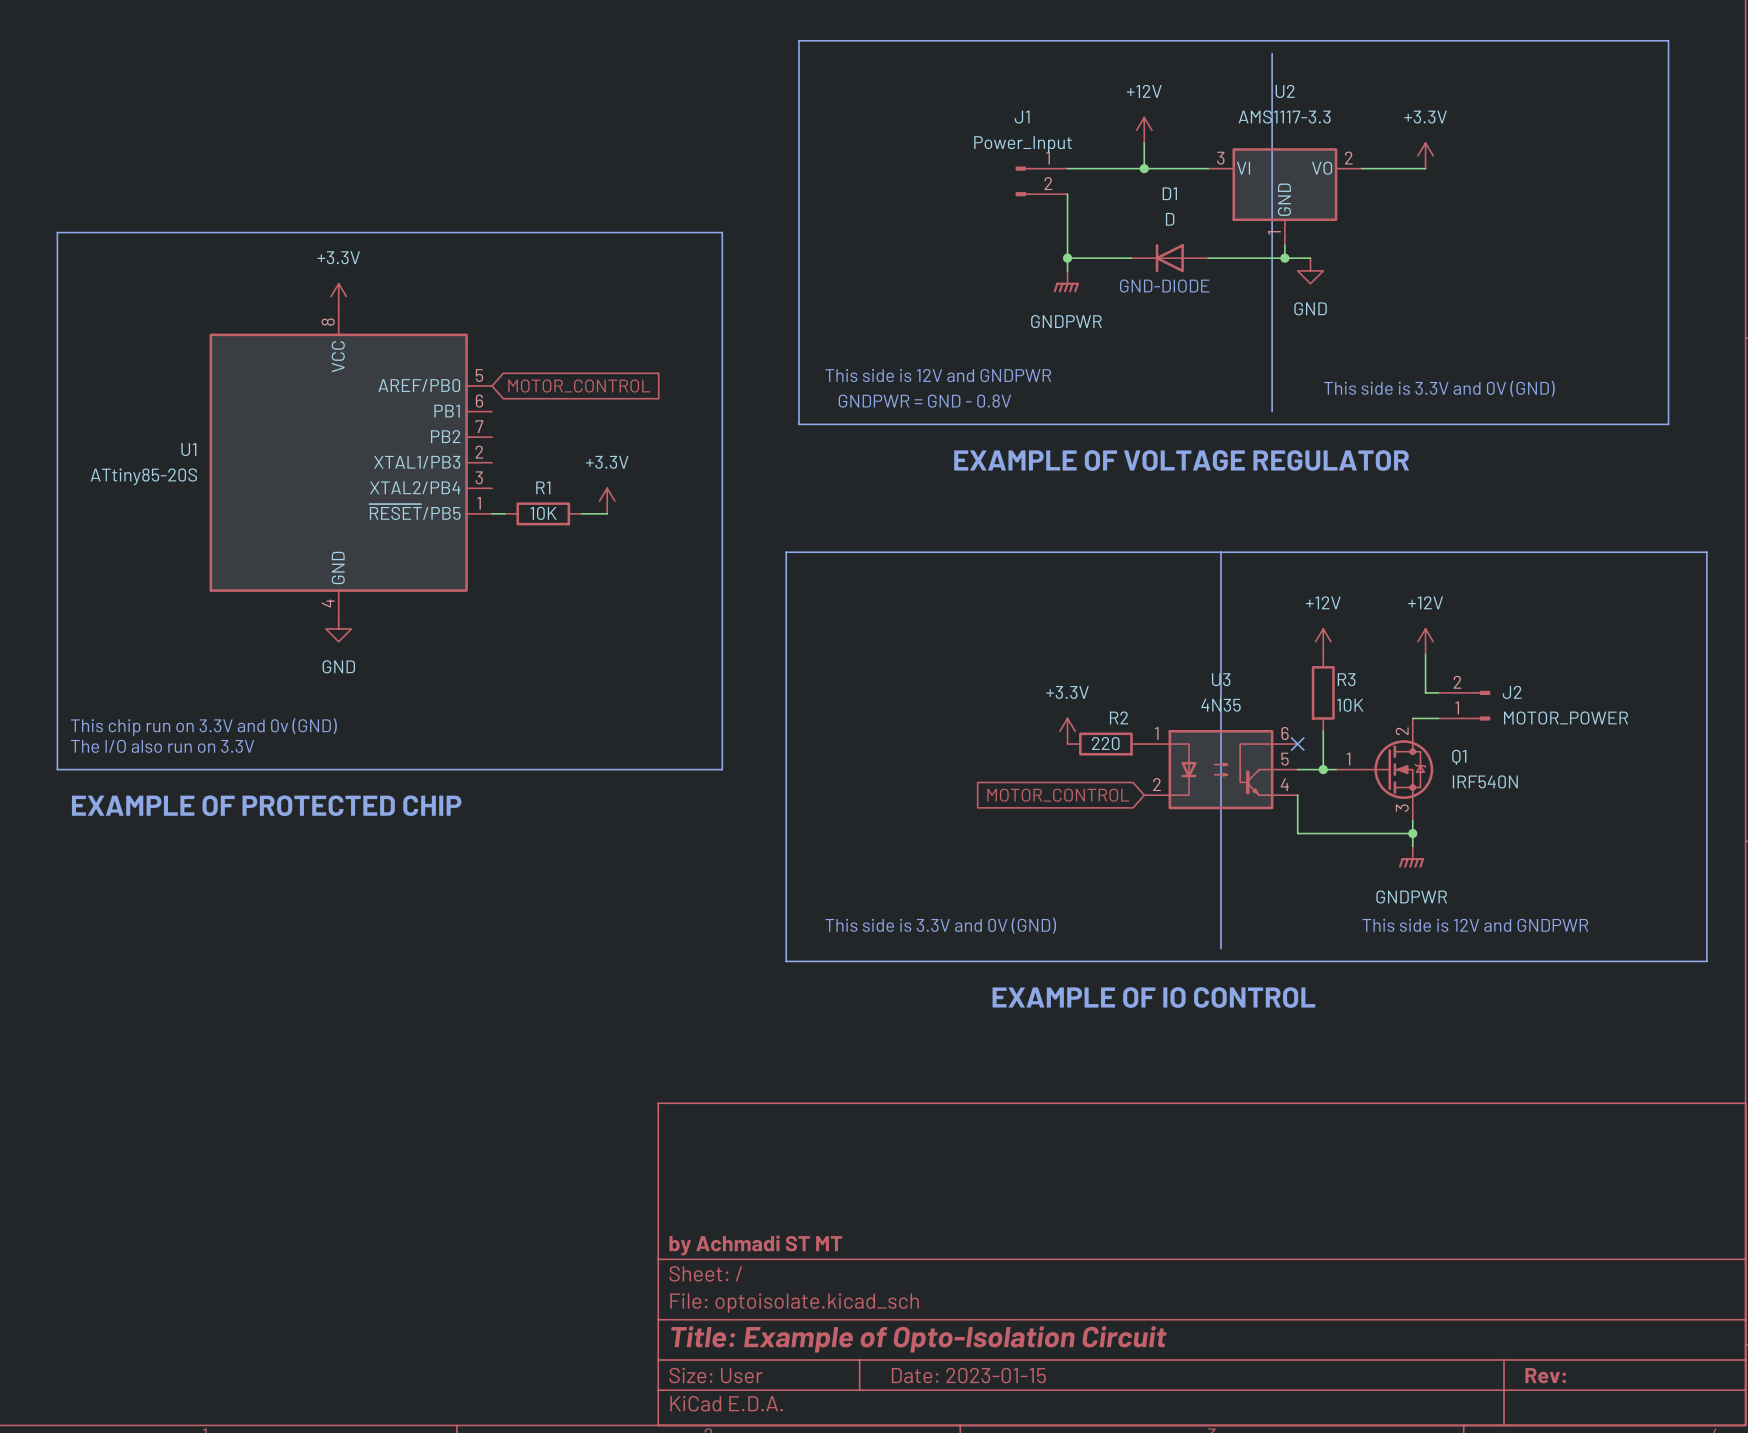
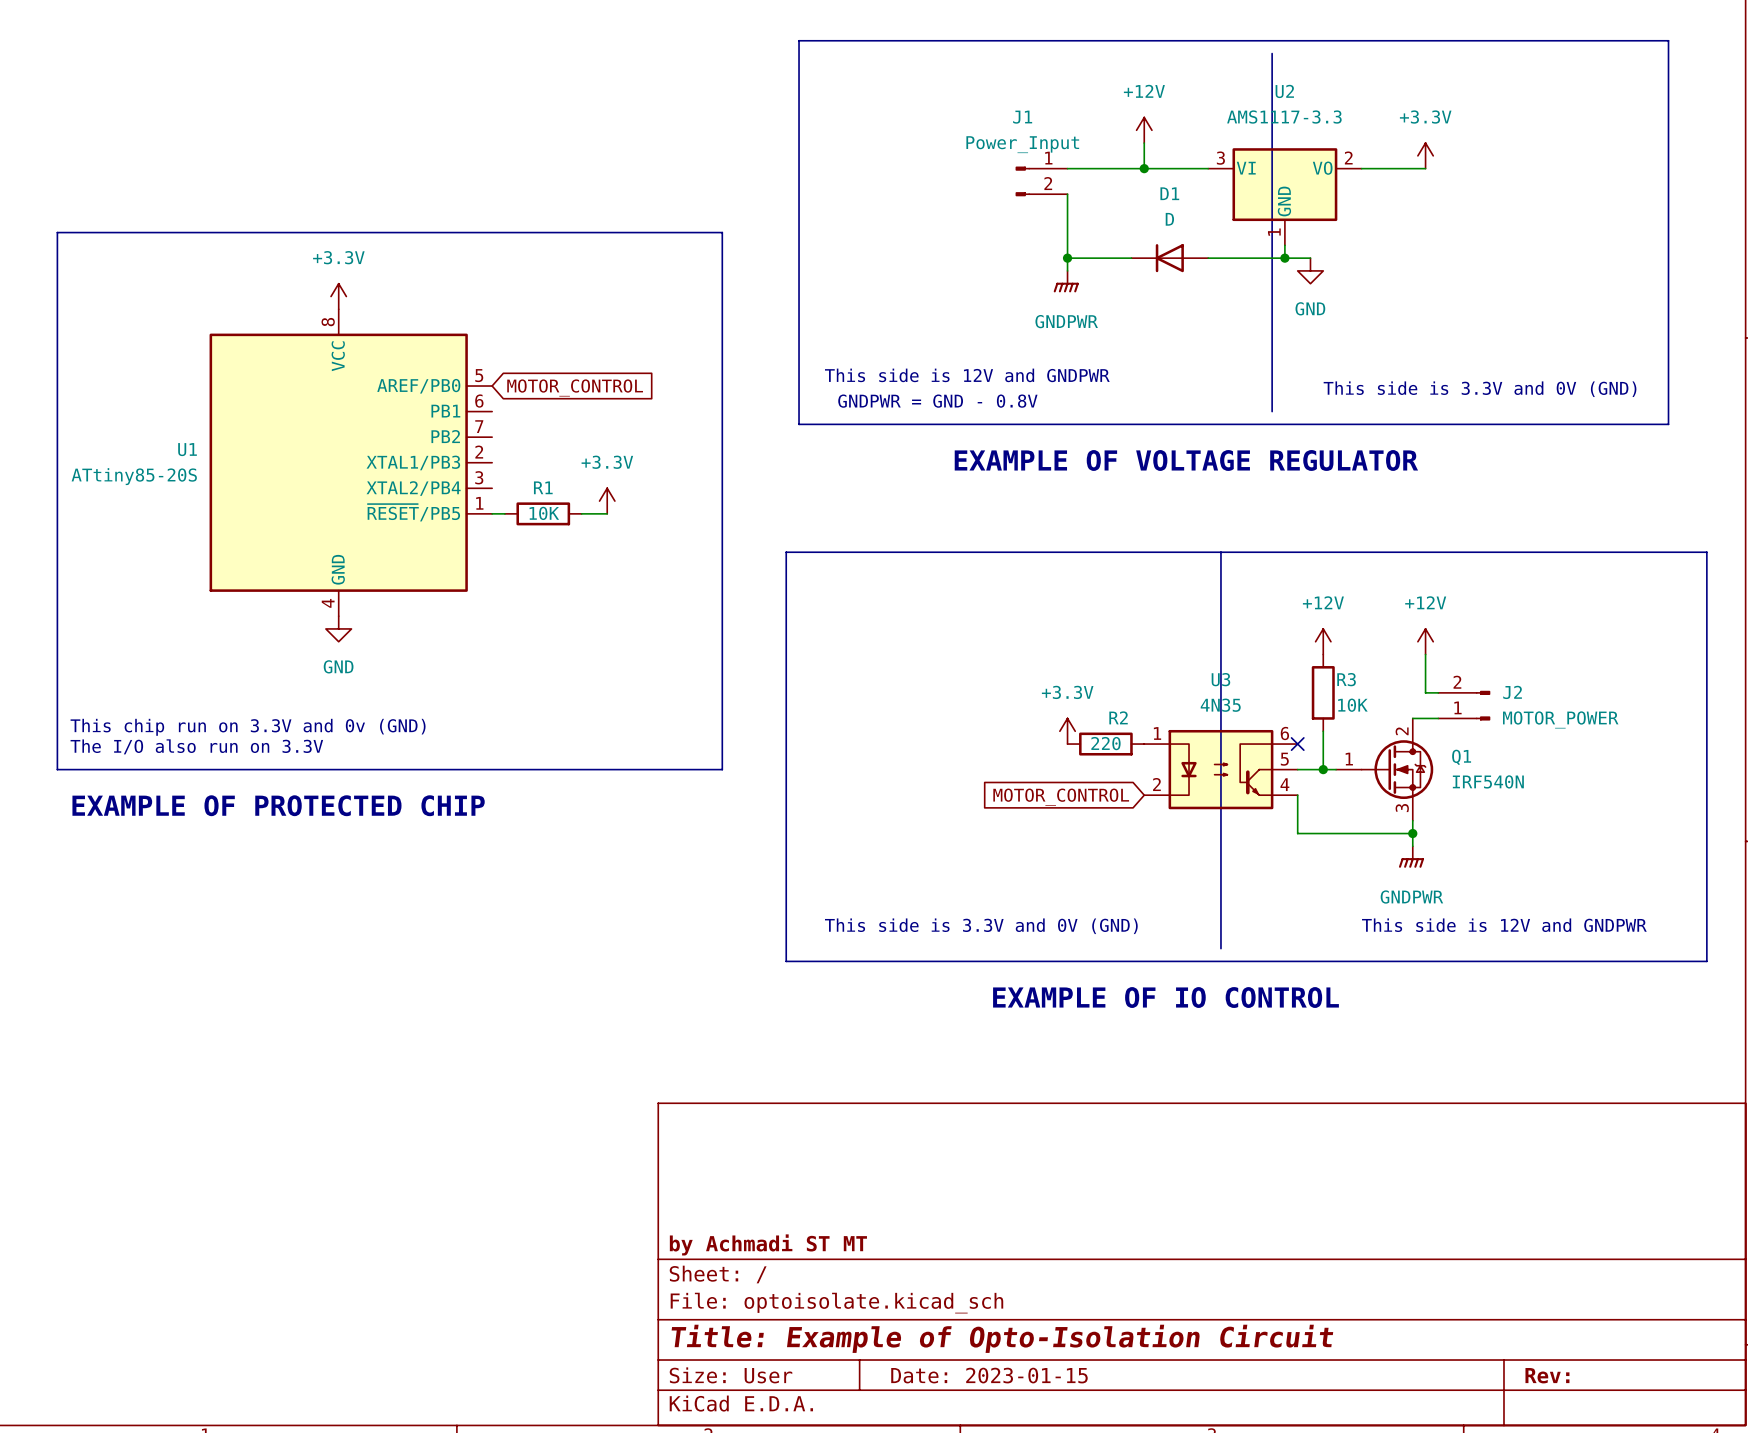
text: GND-DIODE (1164, 286) -> none

